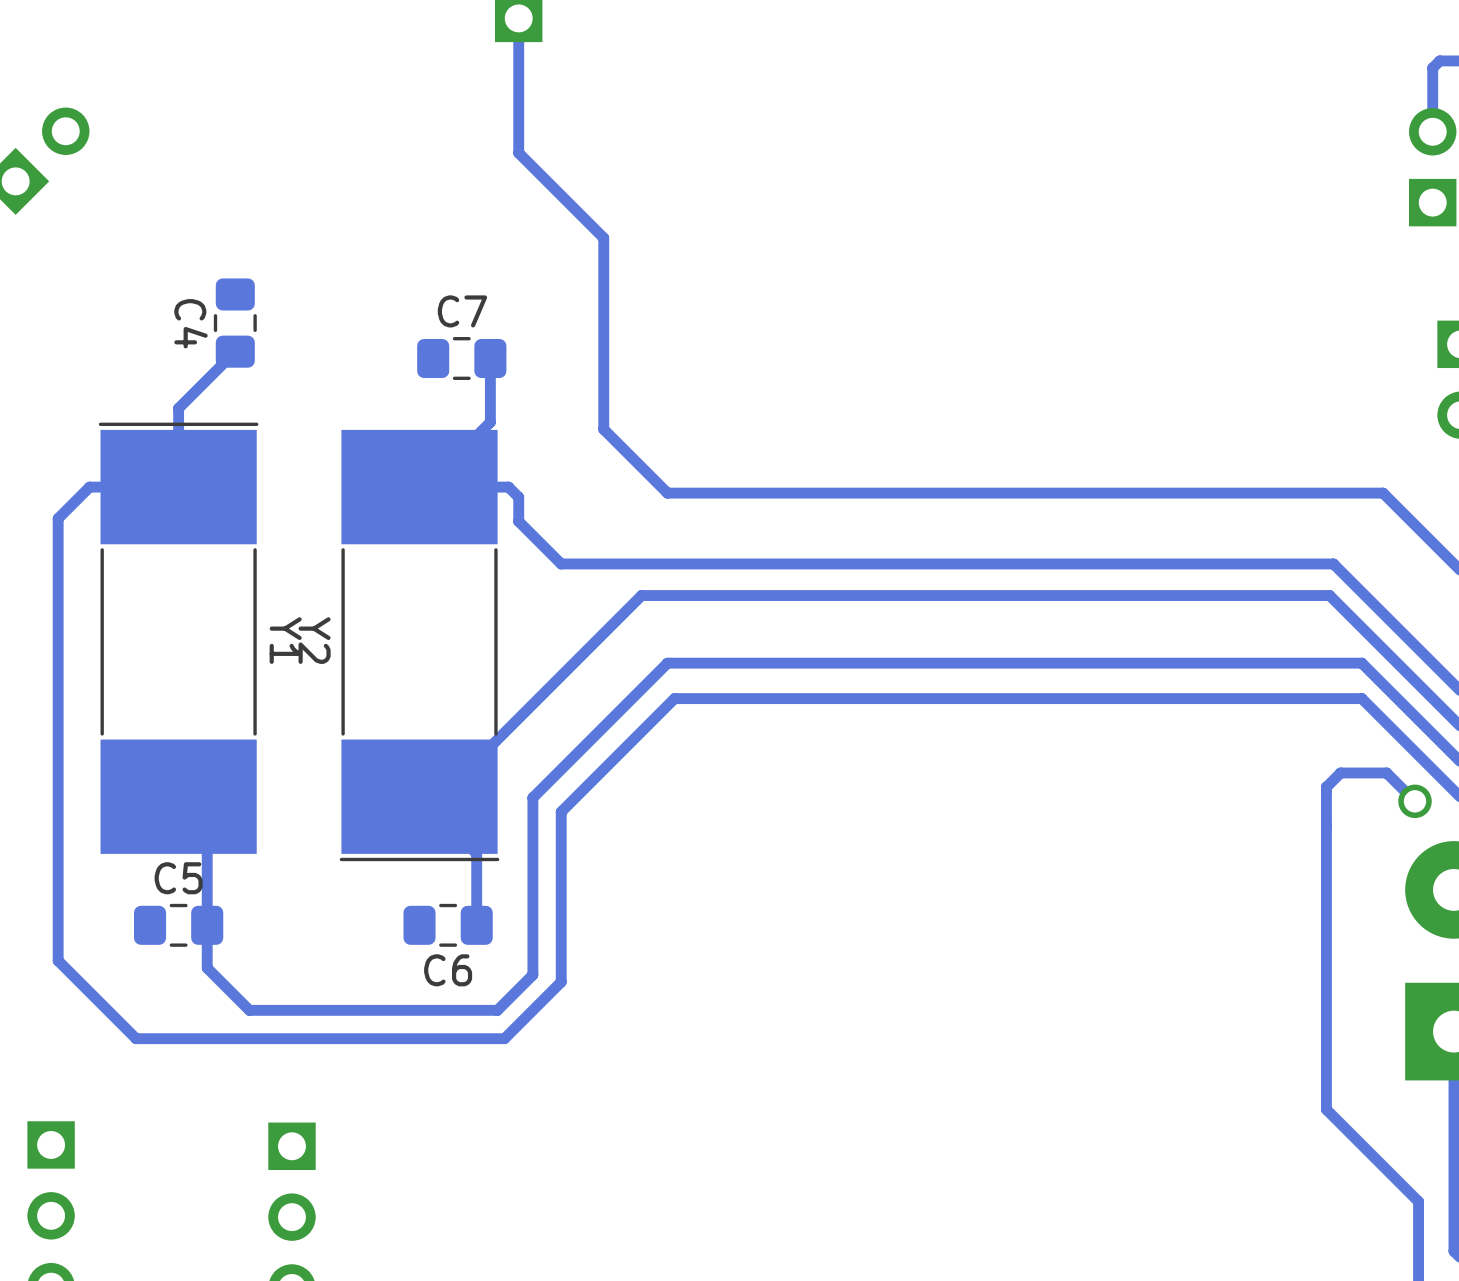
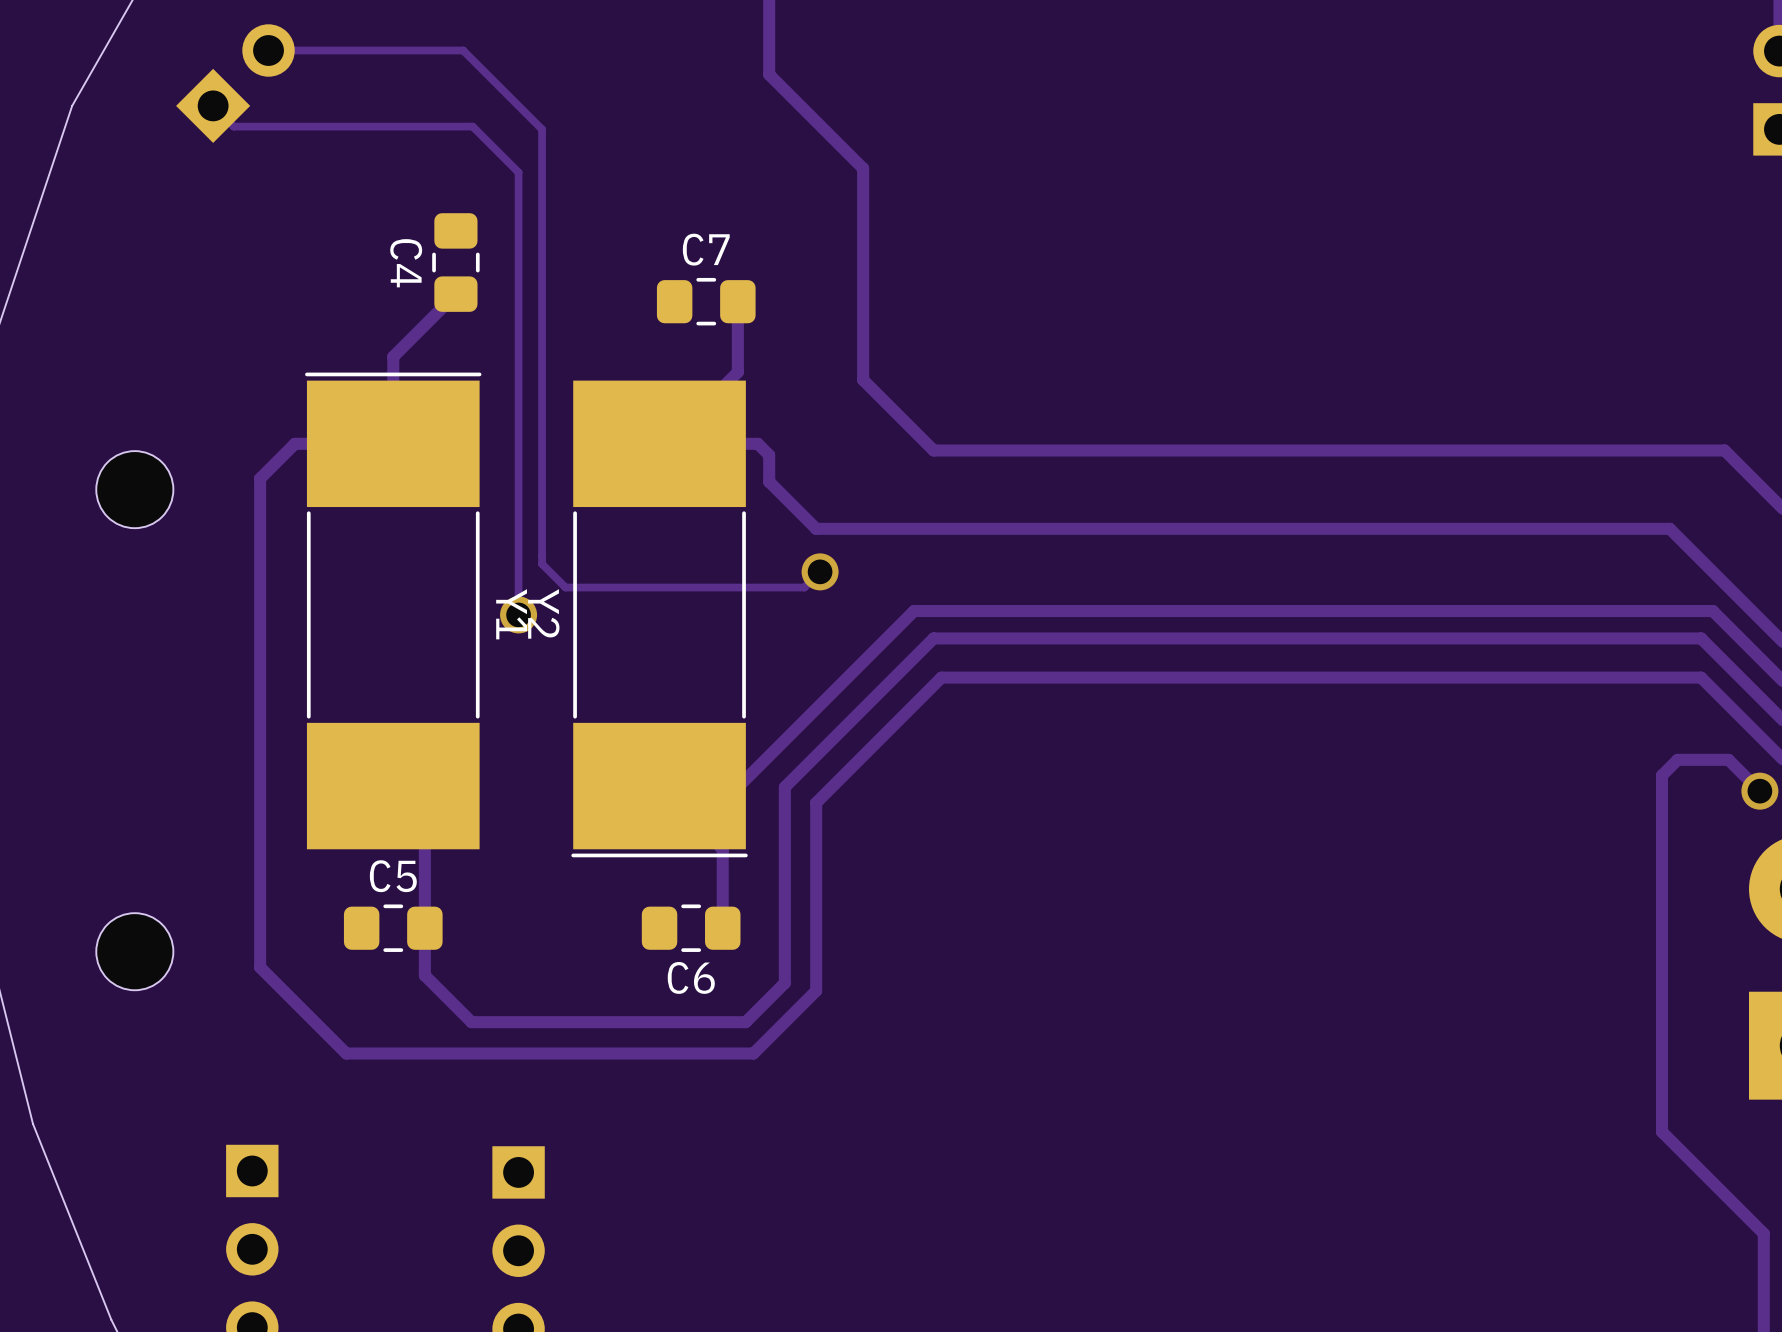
track: none -> (268, 50) (463, 50) (542, 129) (542, 564) (565, 587) (804, 587) (820, 571)
track: none -> (213, 105) (233, 126) (472, 126) (518, 172) (518, 614)
via: none -> (820, 571)
track: (1372, 638) (1329, 595) (641, 595) (440, 796) -> (1712, 611) (914, 611) (739, 786) (689, 786)
via: none -> (518, 614)

